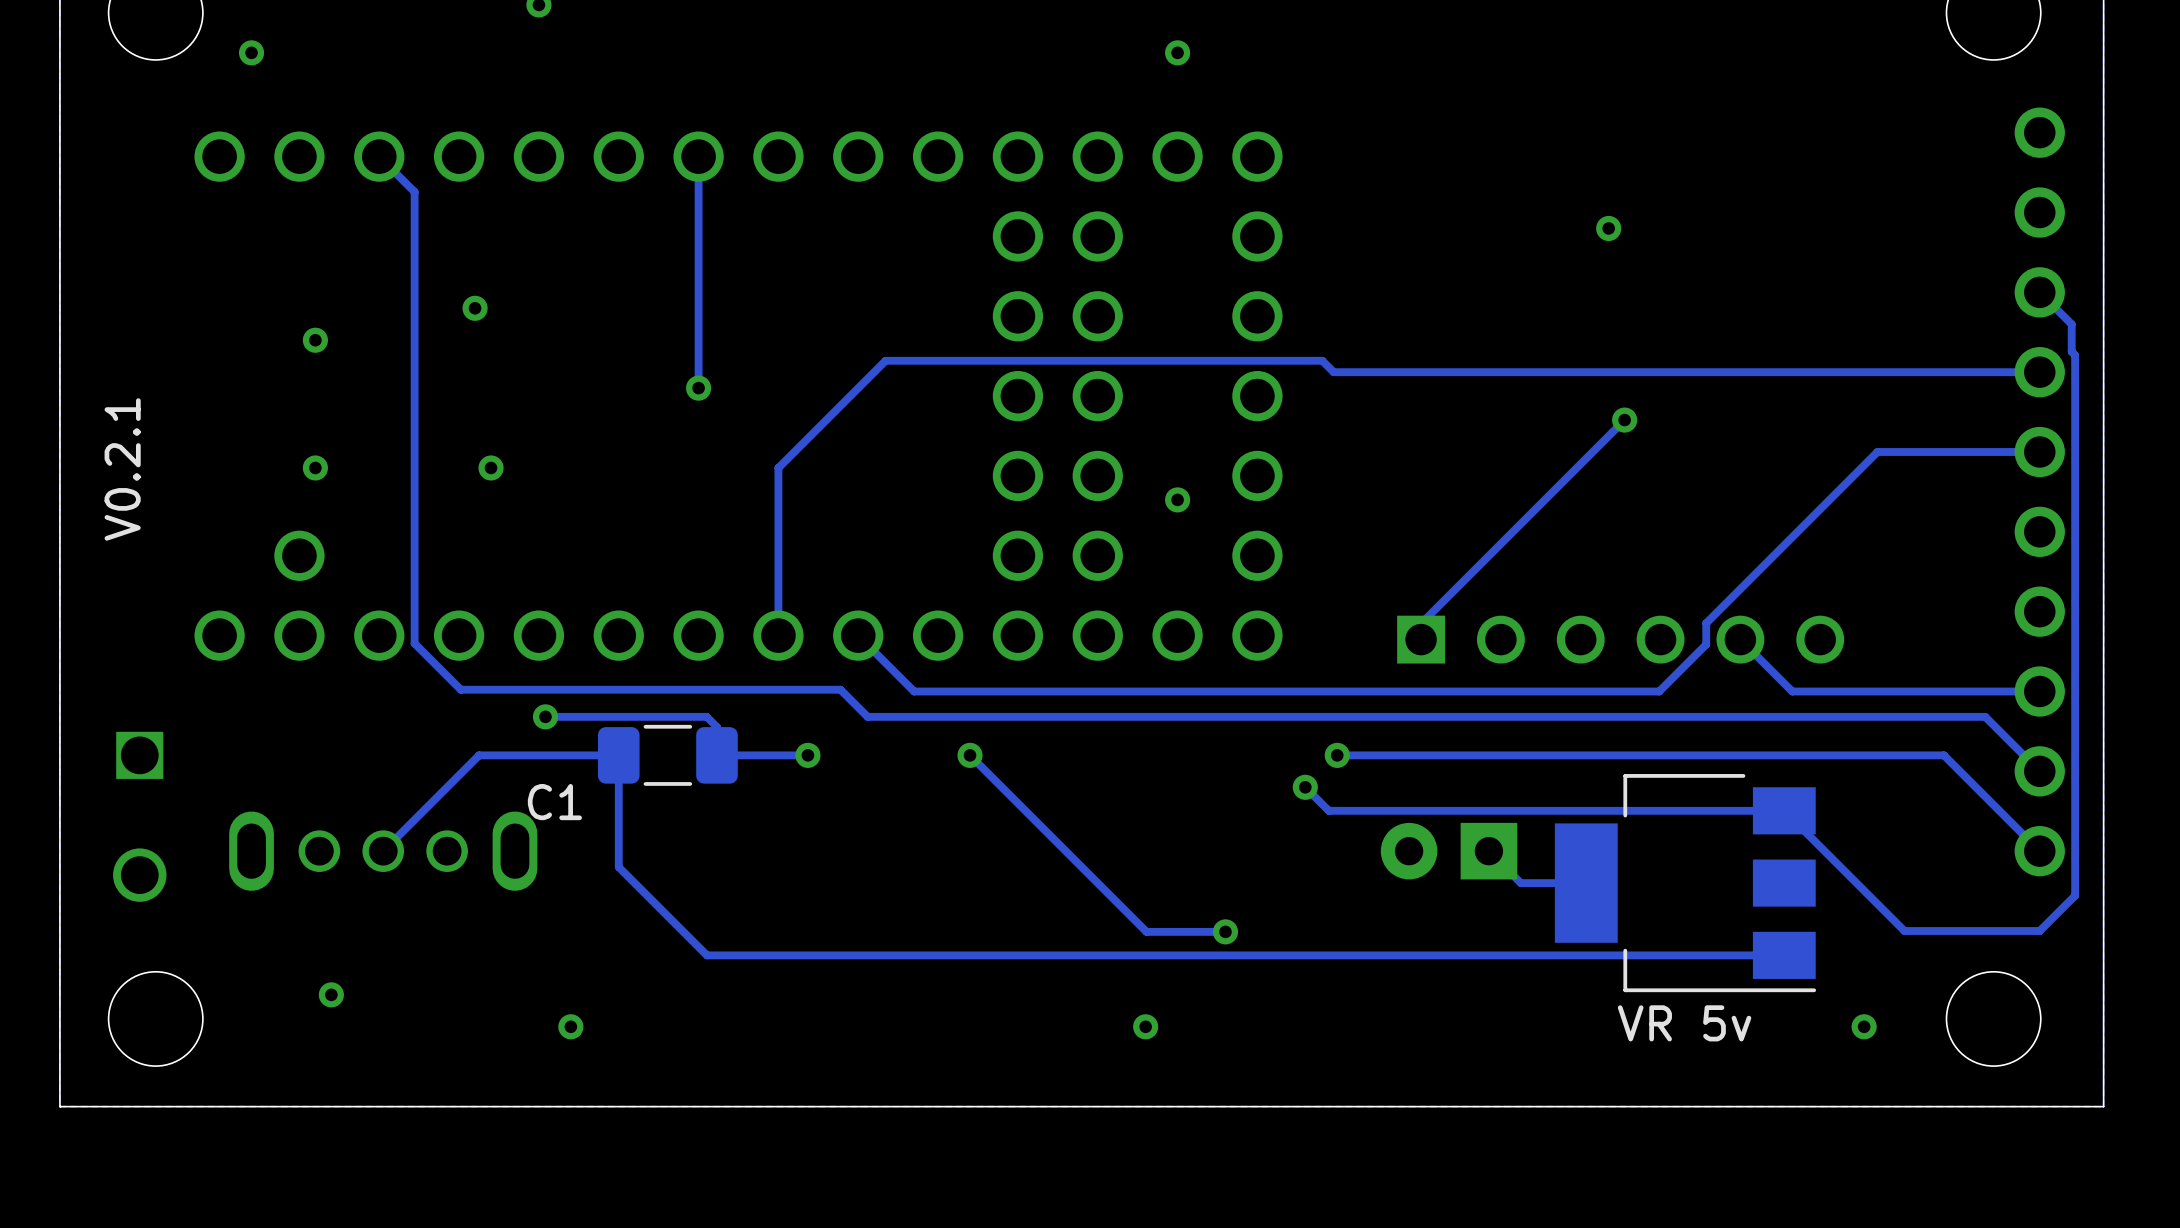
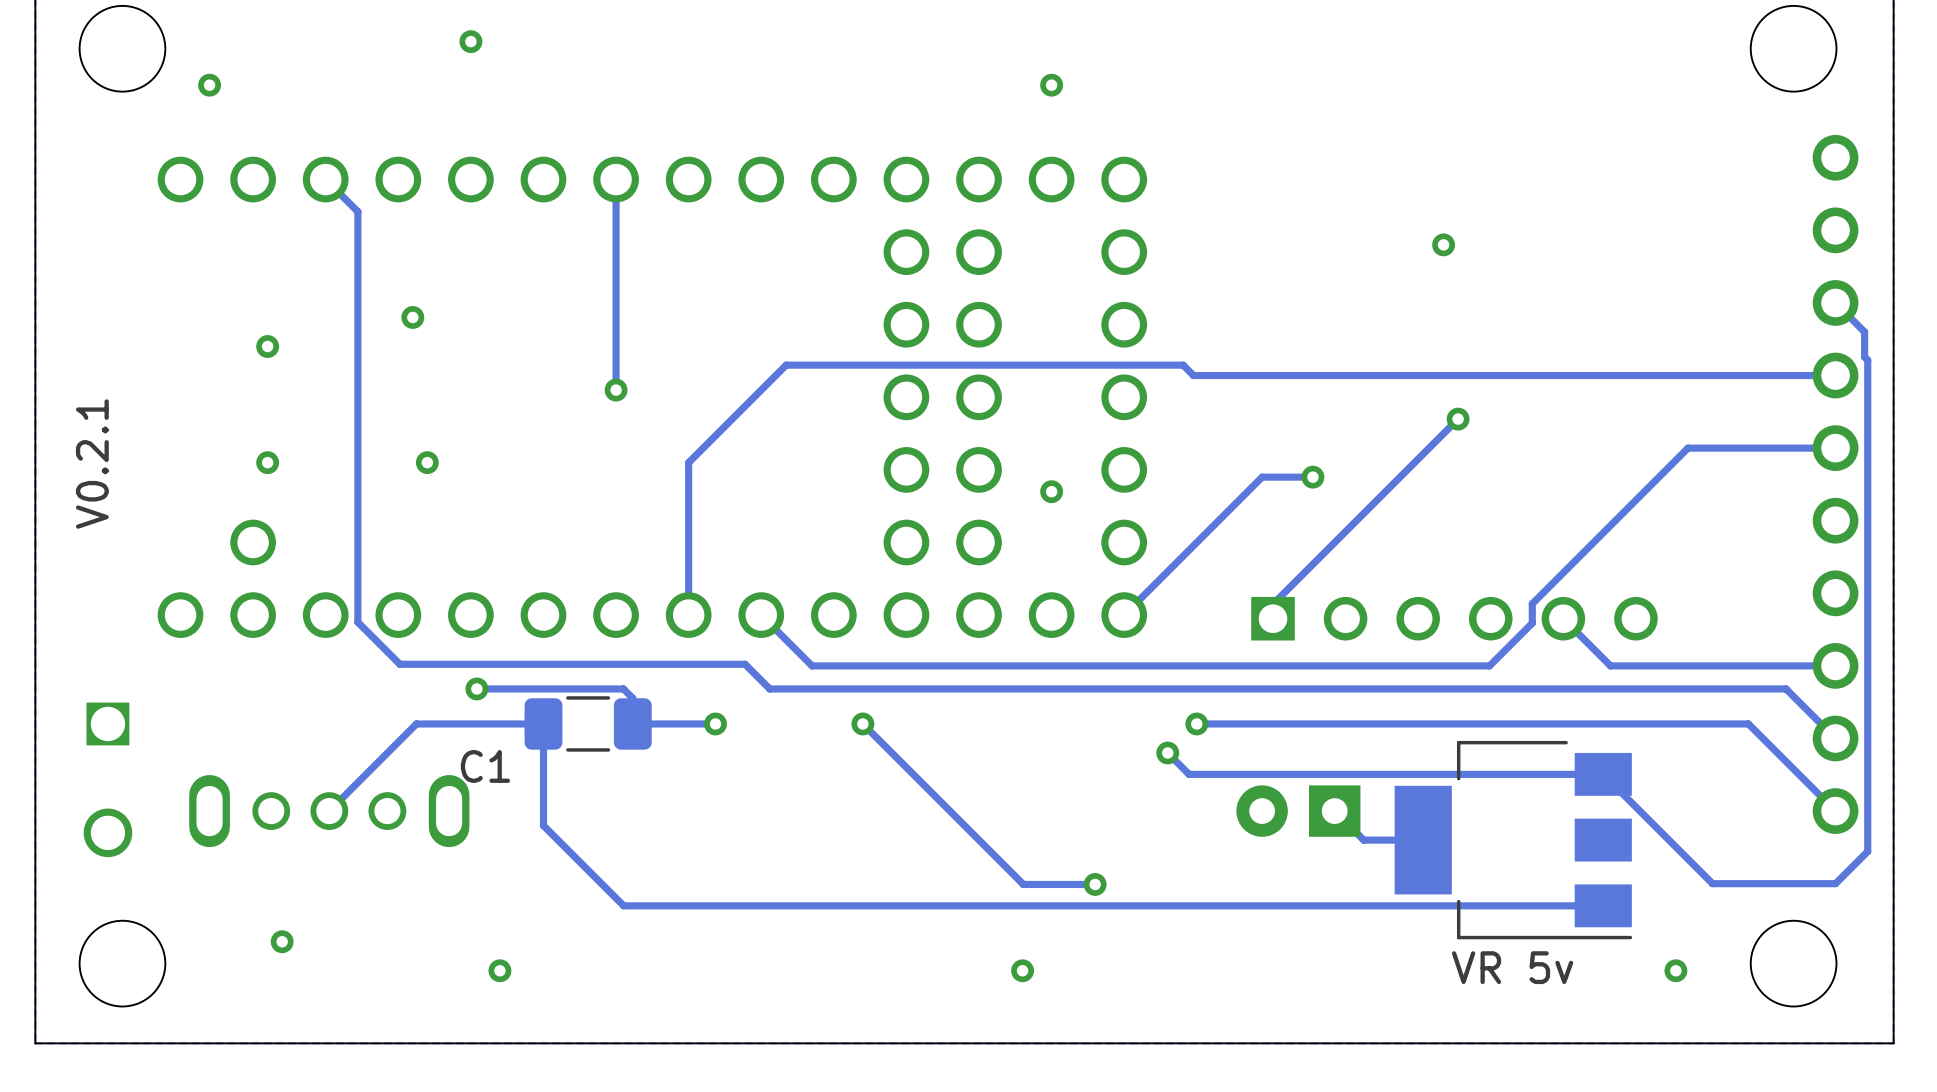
track: none -> (1312, 477) (1262, 477) (1124, 615)
via: none -> (1312, 477)

